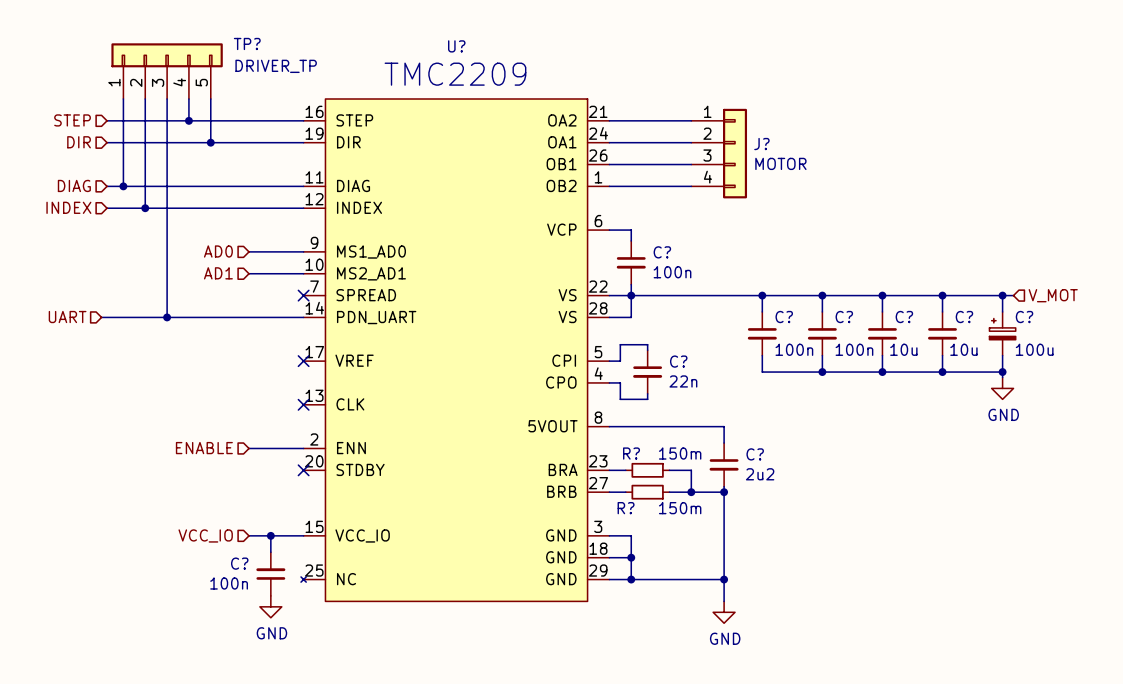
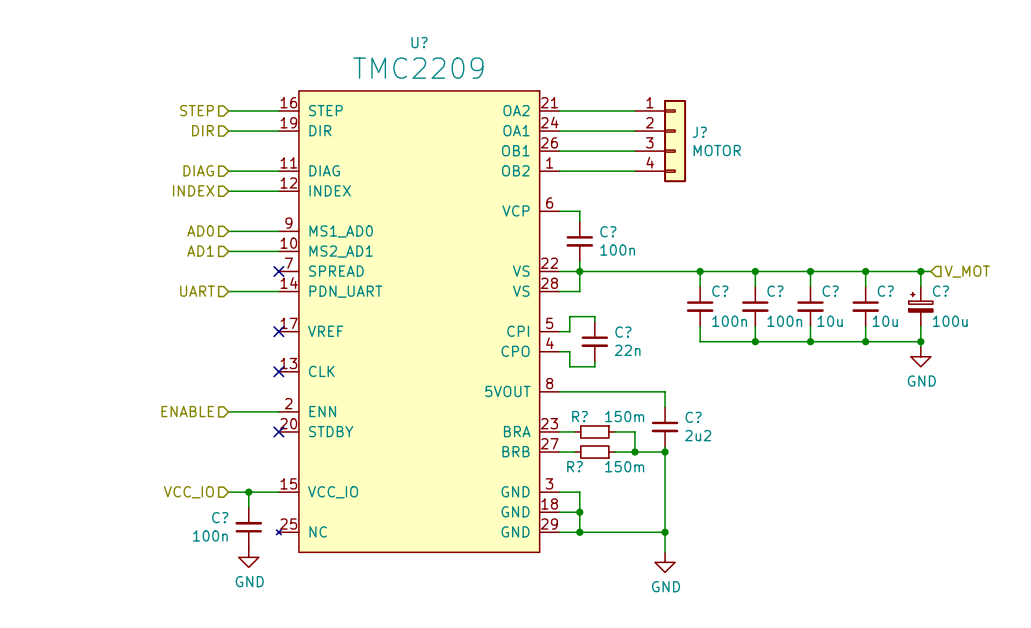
TP?: DRIVER_TP (167, 71) -> none
wire: (123, 99) (123, 186) -> none
wire: (145, 99) (145, 208) -> none
wire: (167, 99) (167, 317) -> none
wire: (188, 99) (188, 120) -> none
wire: (210, 99) (210, 142) -> none
hierarchical label position: STEP (72, 120) -> STEP (197, 110)
wire: (107, 120) (249, 120) -> none
junction: (188, 120) -> none
hierarchical label position: DIR (79, 142) -> DIR (202, 130)
wire: (107, 142) (249, 142) -> none
junction: (210, 142) -> none
hierarchical label position: DIAG (74, 185) -> DIAG (198, 170)
wire: (107, 186) (249, 186) -> none
junction: (123, 186) -> none
hierarchical label position: INDEX (68, 207) -> INDEX (193, 190)
wire: (107, 208) (249, 208) -> none
junction: (145, 208) -> none
hierarchical label position: UART (67, 317) -> UART (197, 291)
wire: (101, 317) (249, 317) -> none
junction: (167, 317) -> none

